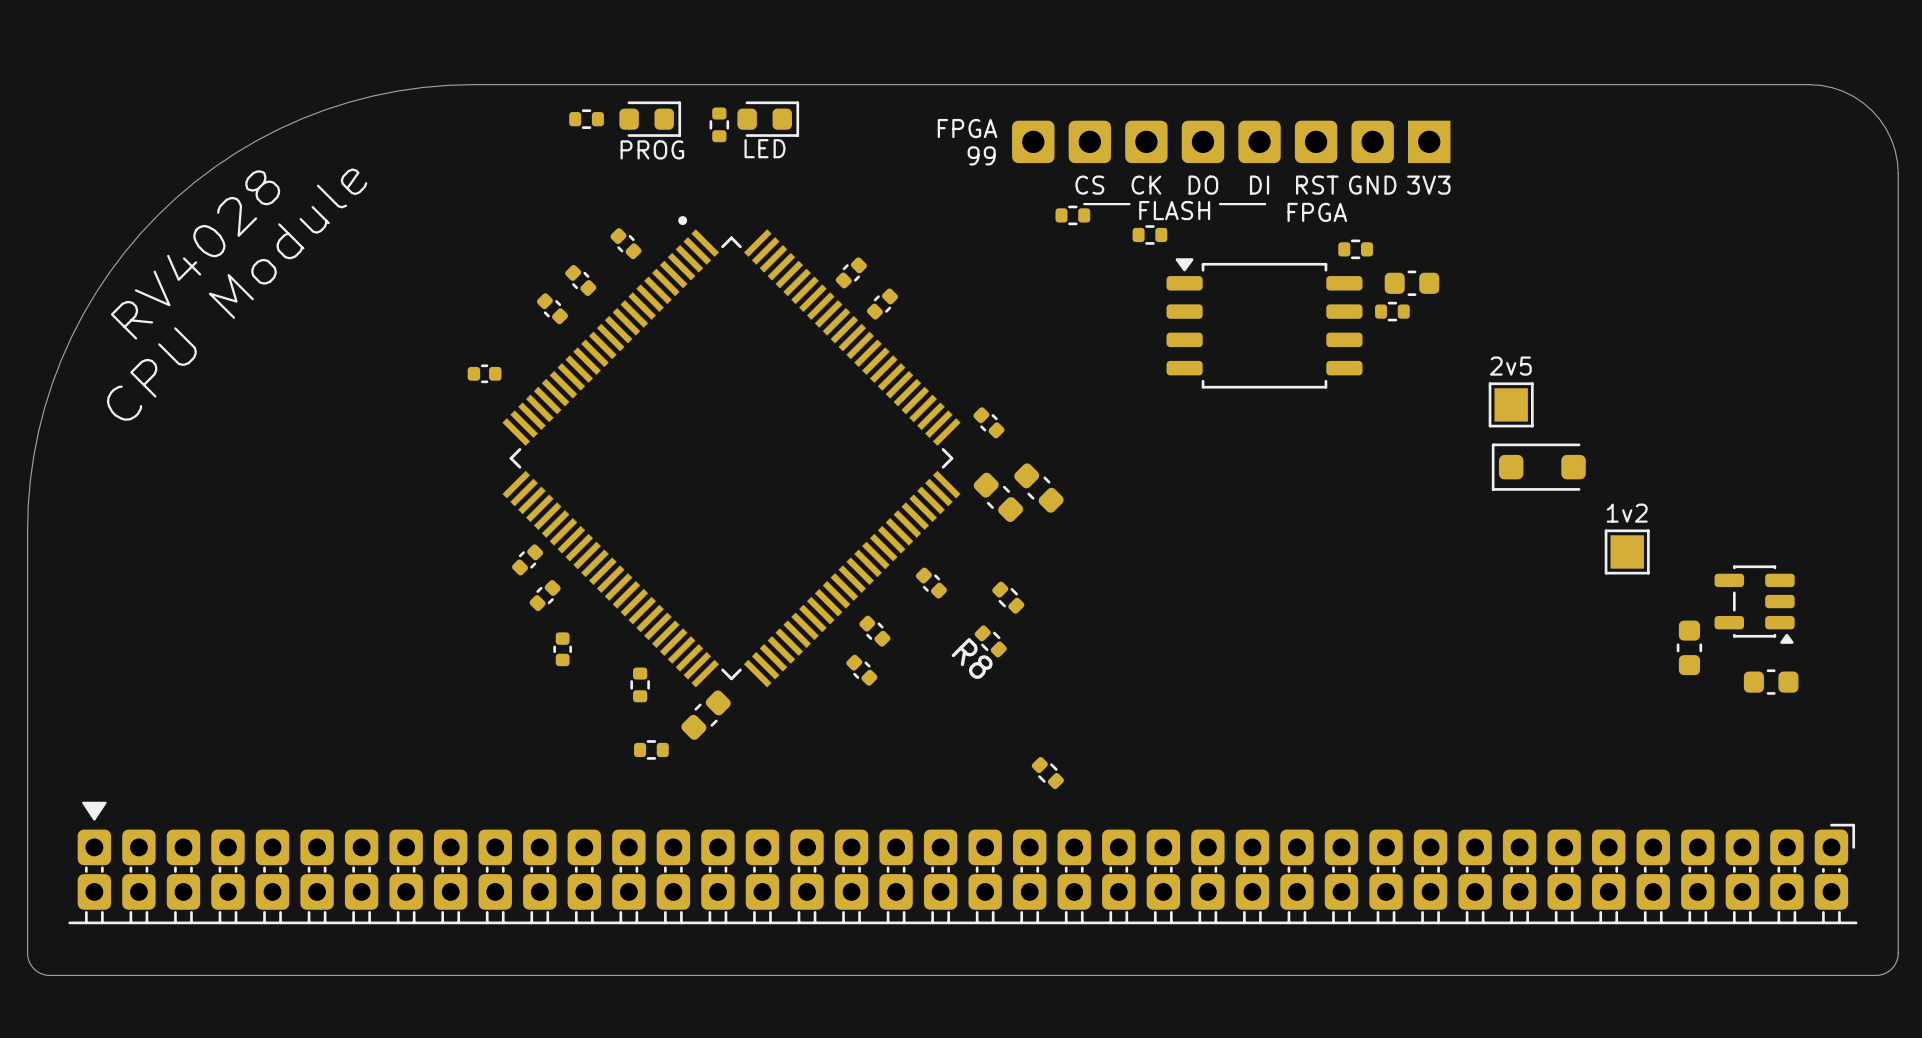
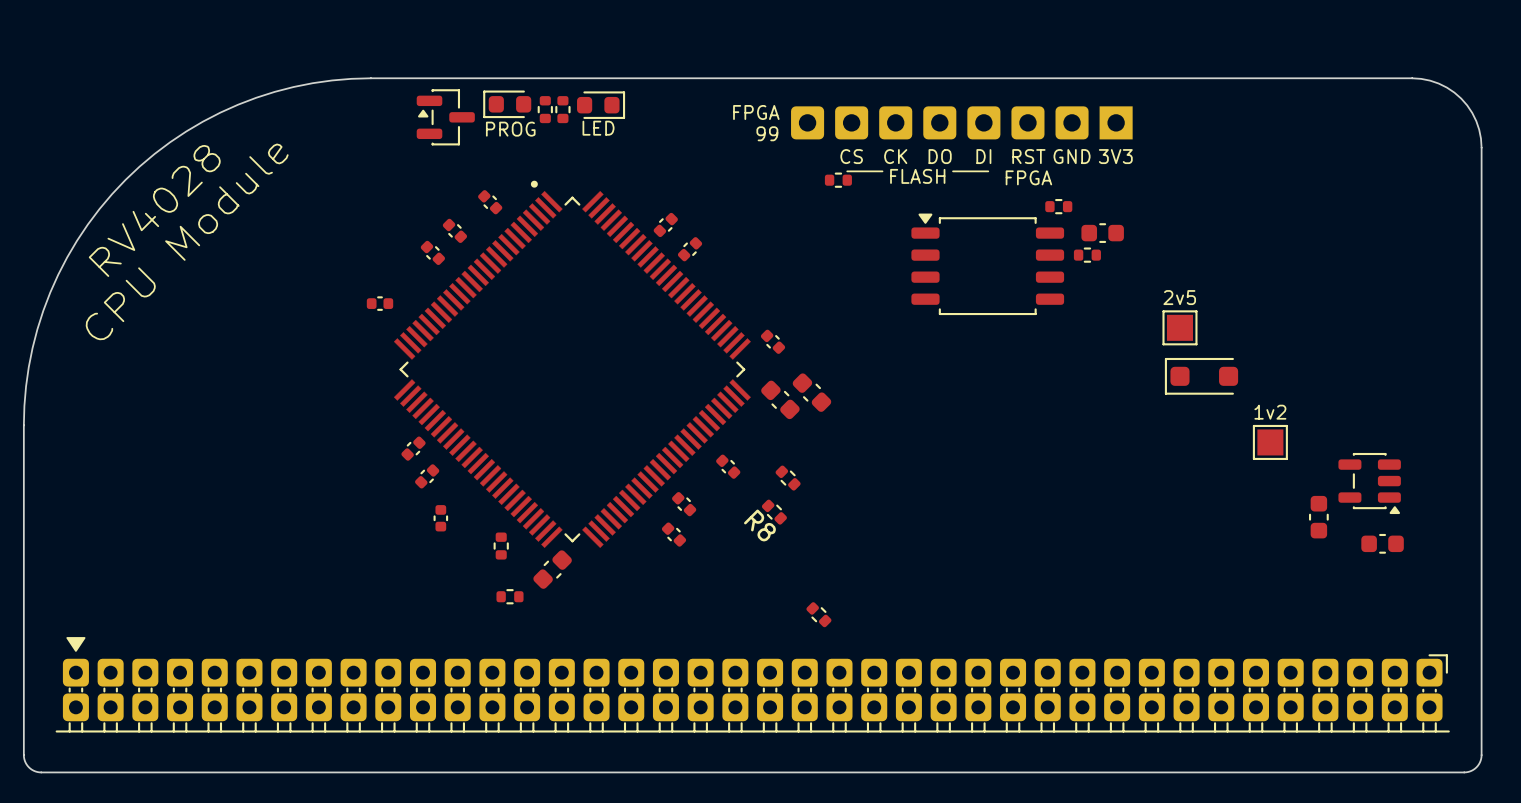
part rotation: 0° (586, 119) -> 90° clockwise (545, 109)
part position: (586, 119) -> (545, 109)
part rotation: 0° (650, 119) -> 180° (507, 104)
part: none -> (445, 117)
part: (1149, 234) -> none

